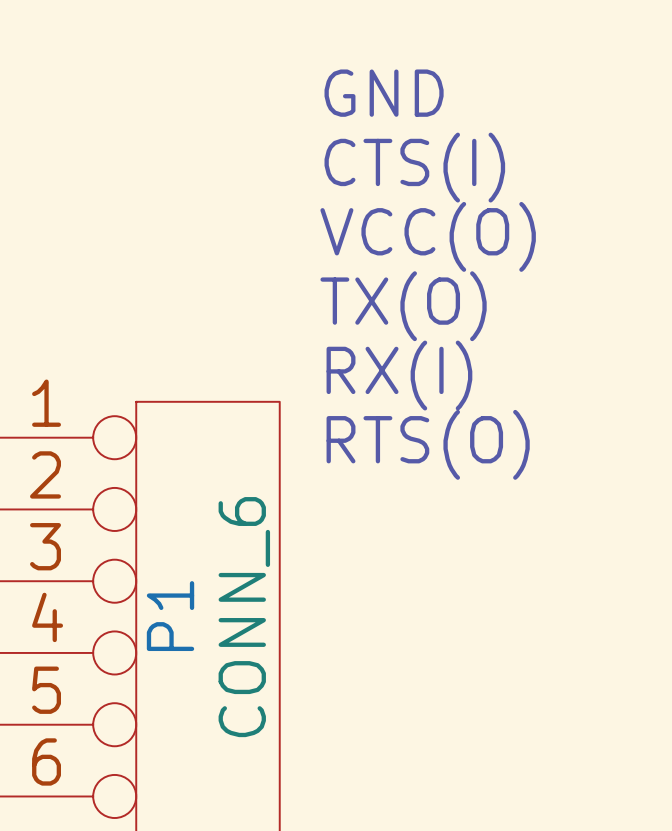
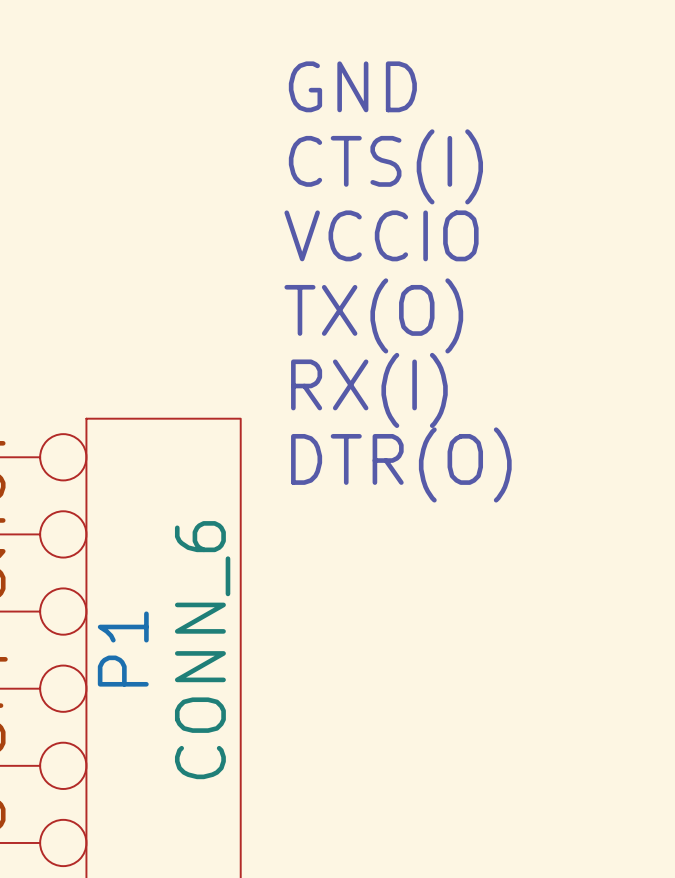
text: VCC(O) (428, 236) -> VCCIO (381, 235)
text: RTS(O) (428, 444) -> DTR(O) (401, 464)

